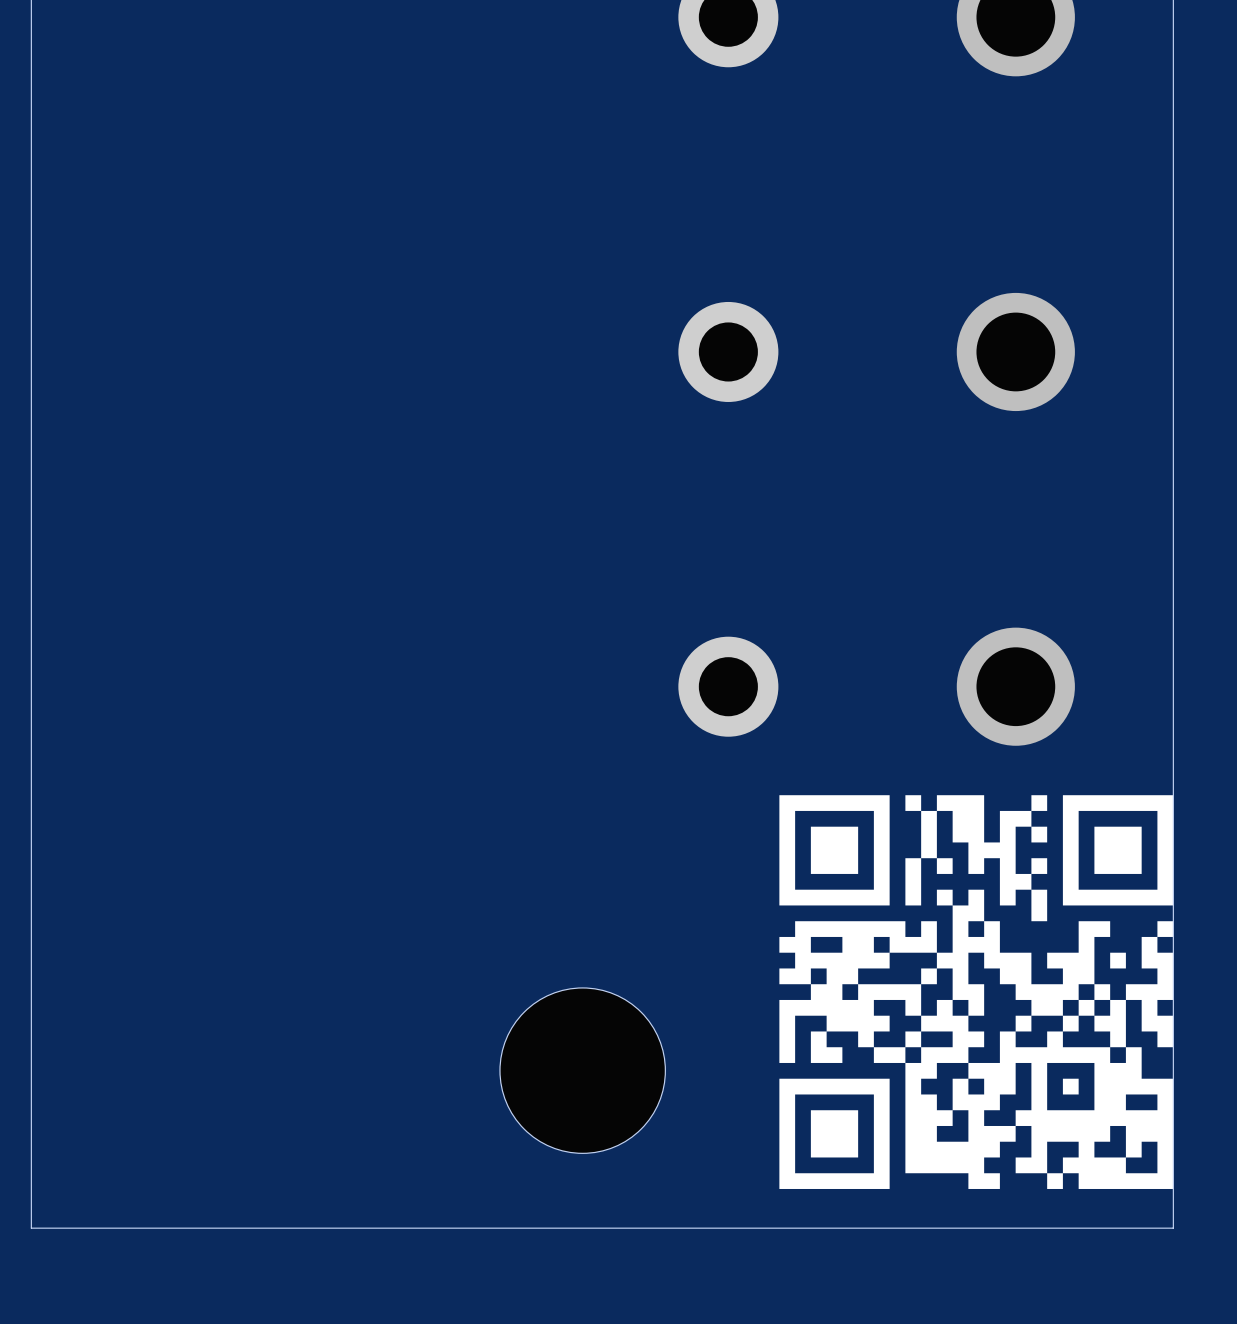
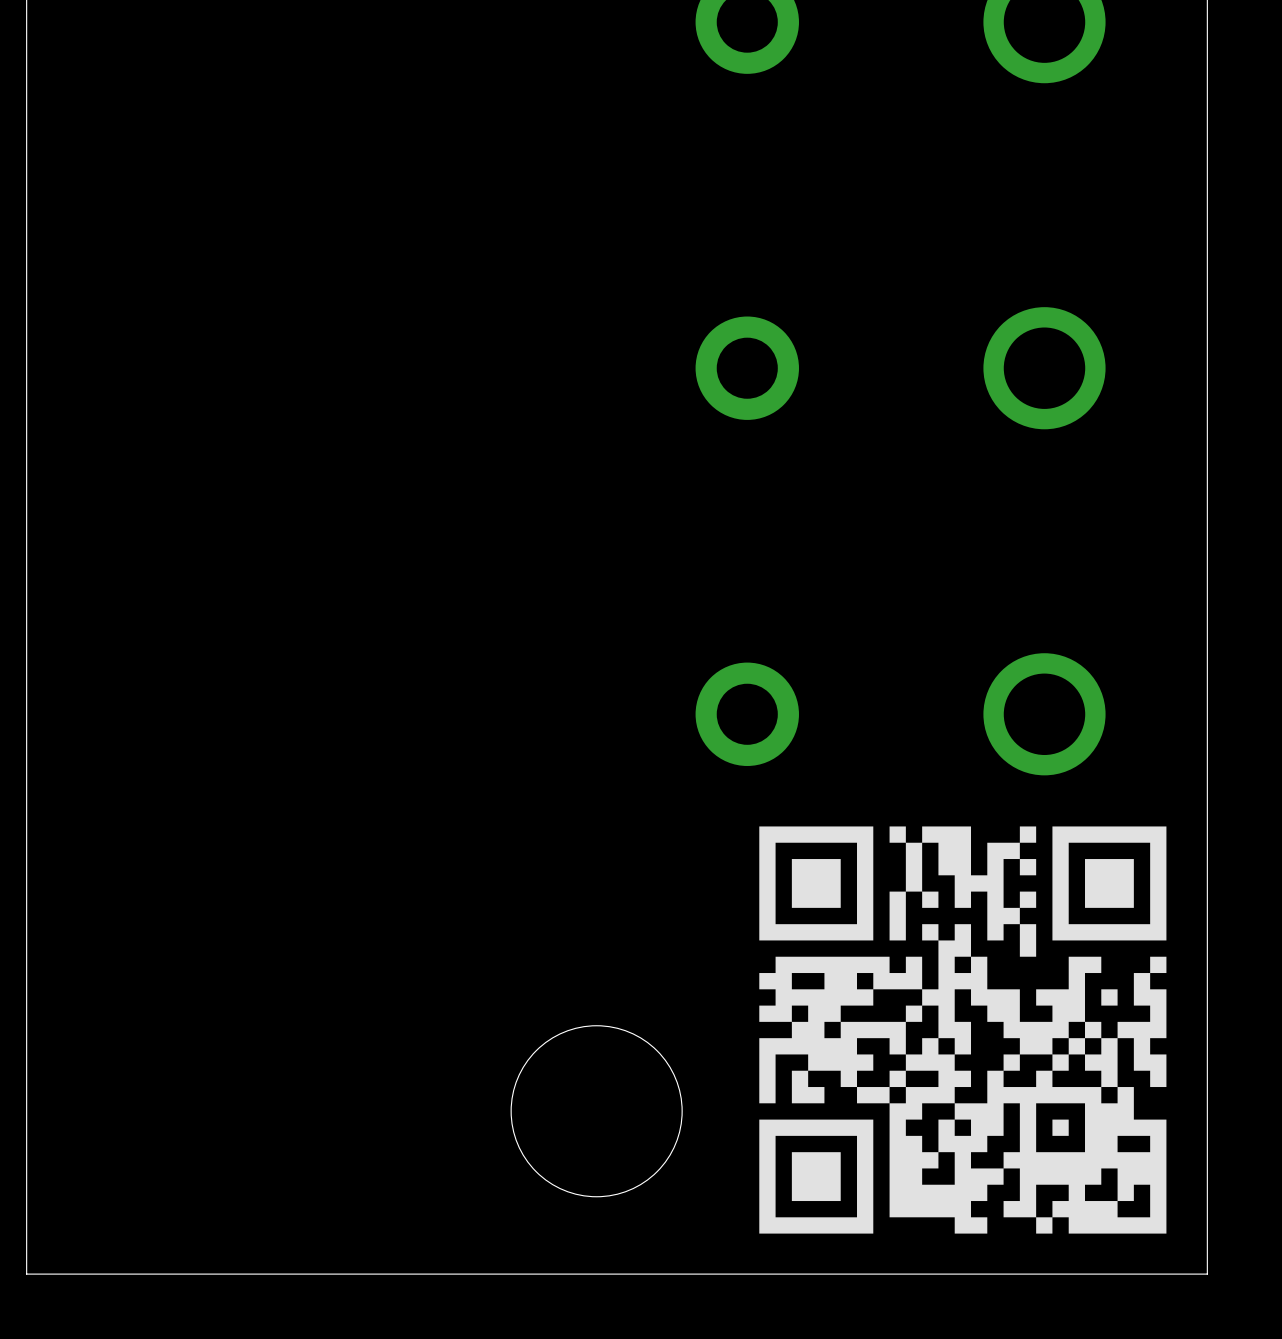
drawing position: (976, 992) -> (962, 1030)

